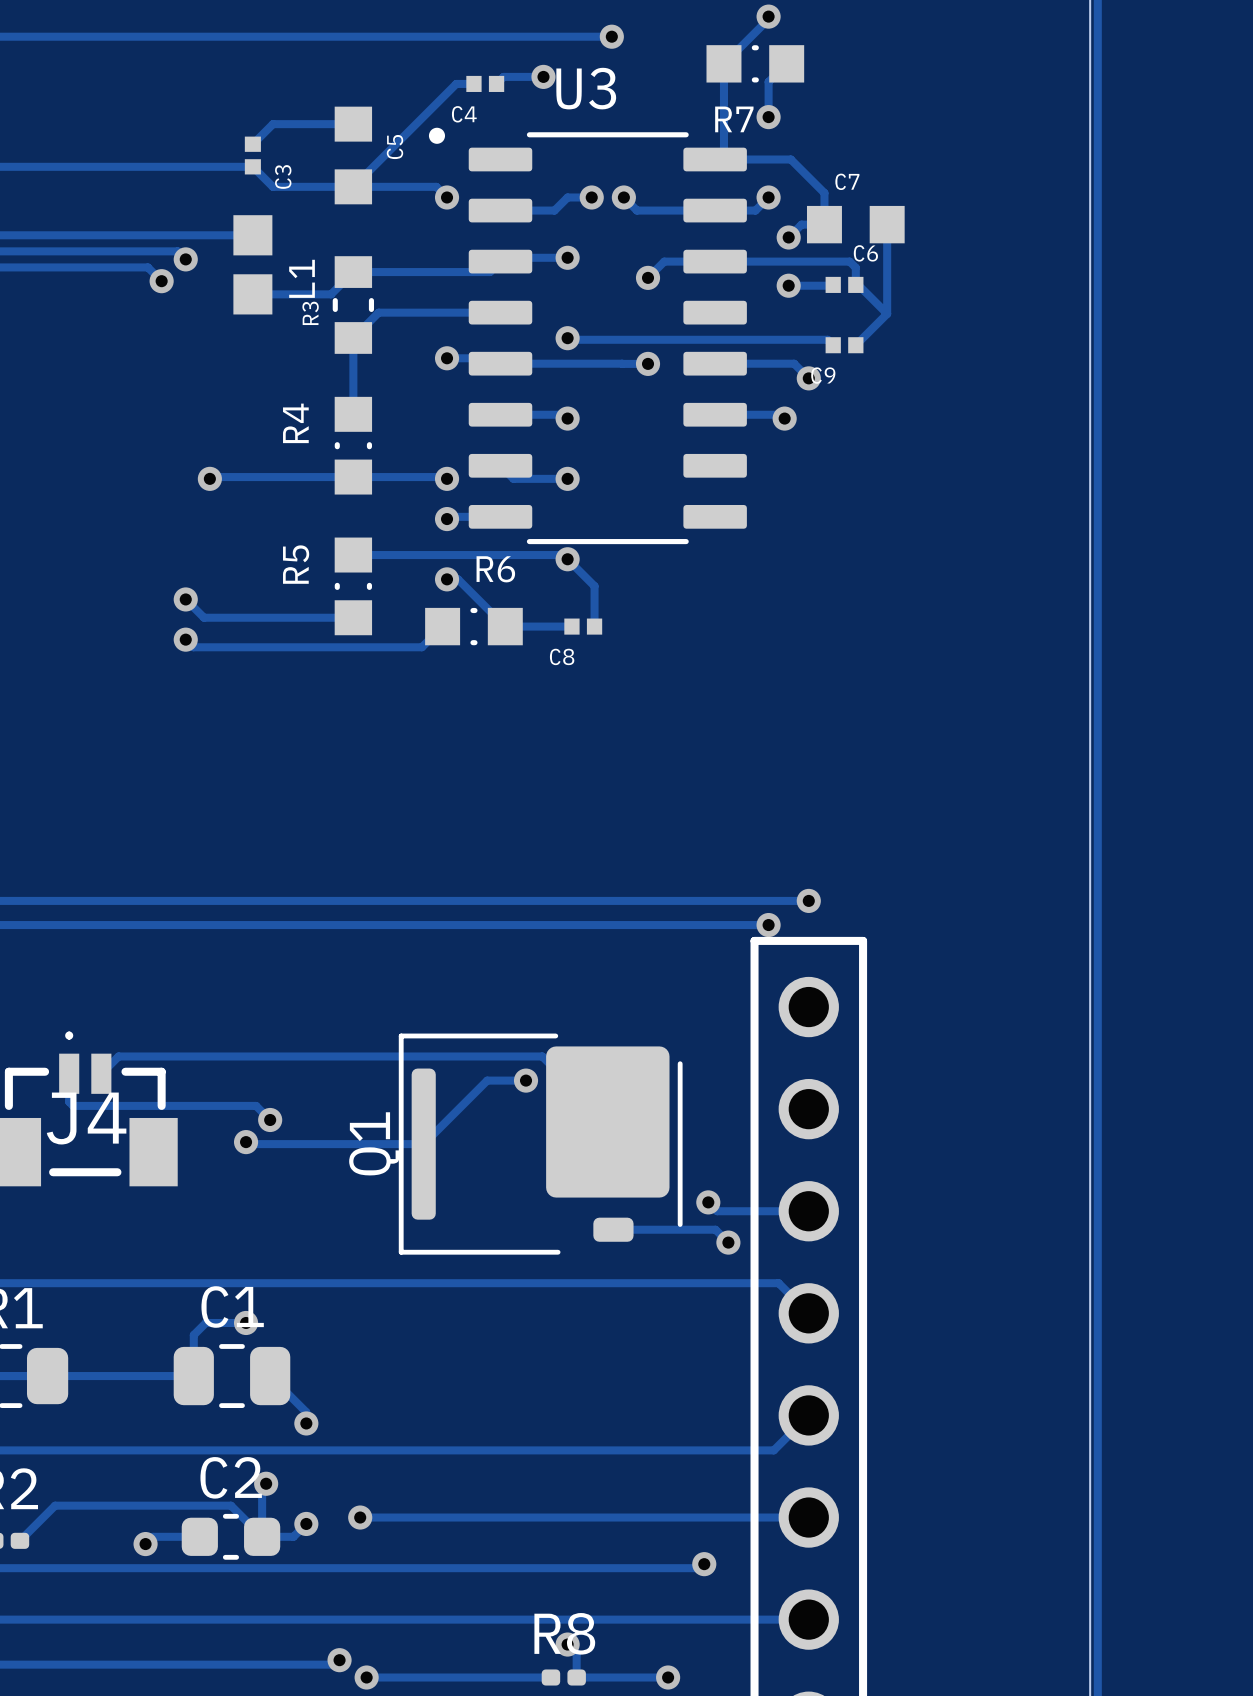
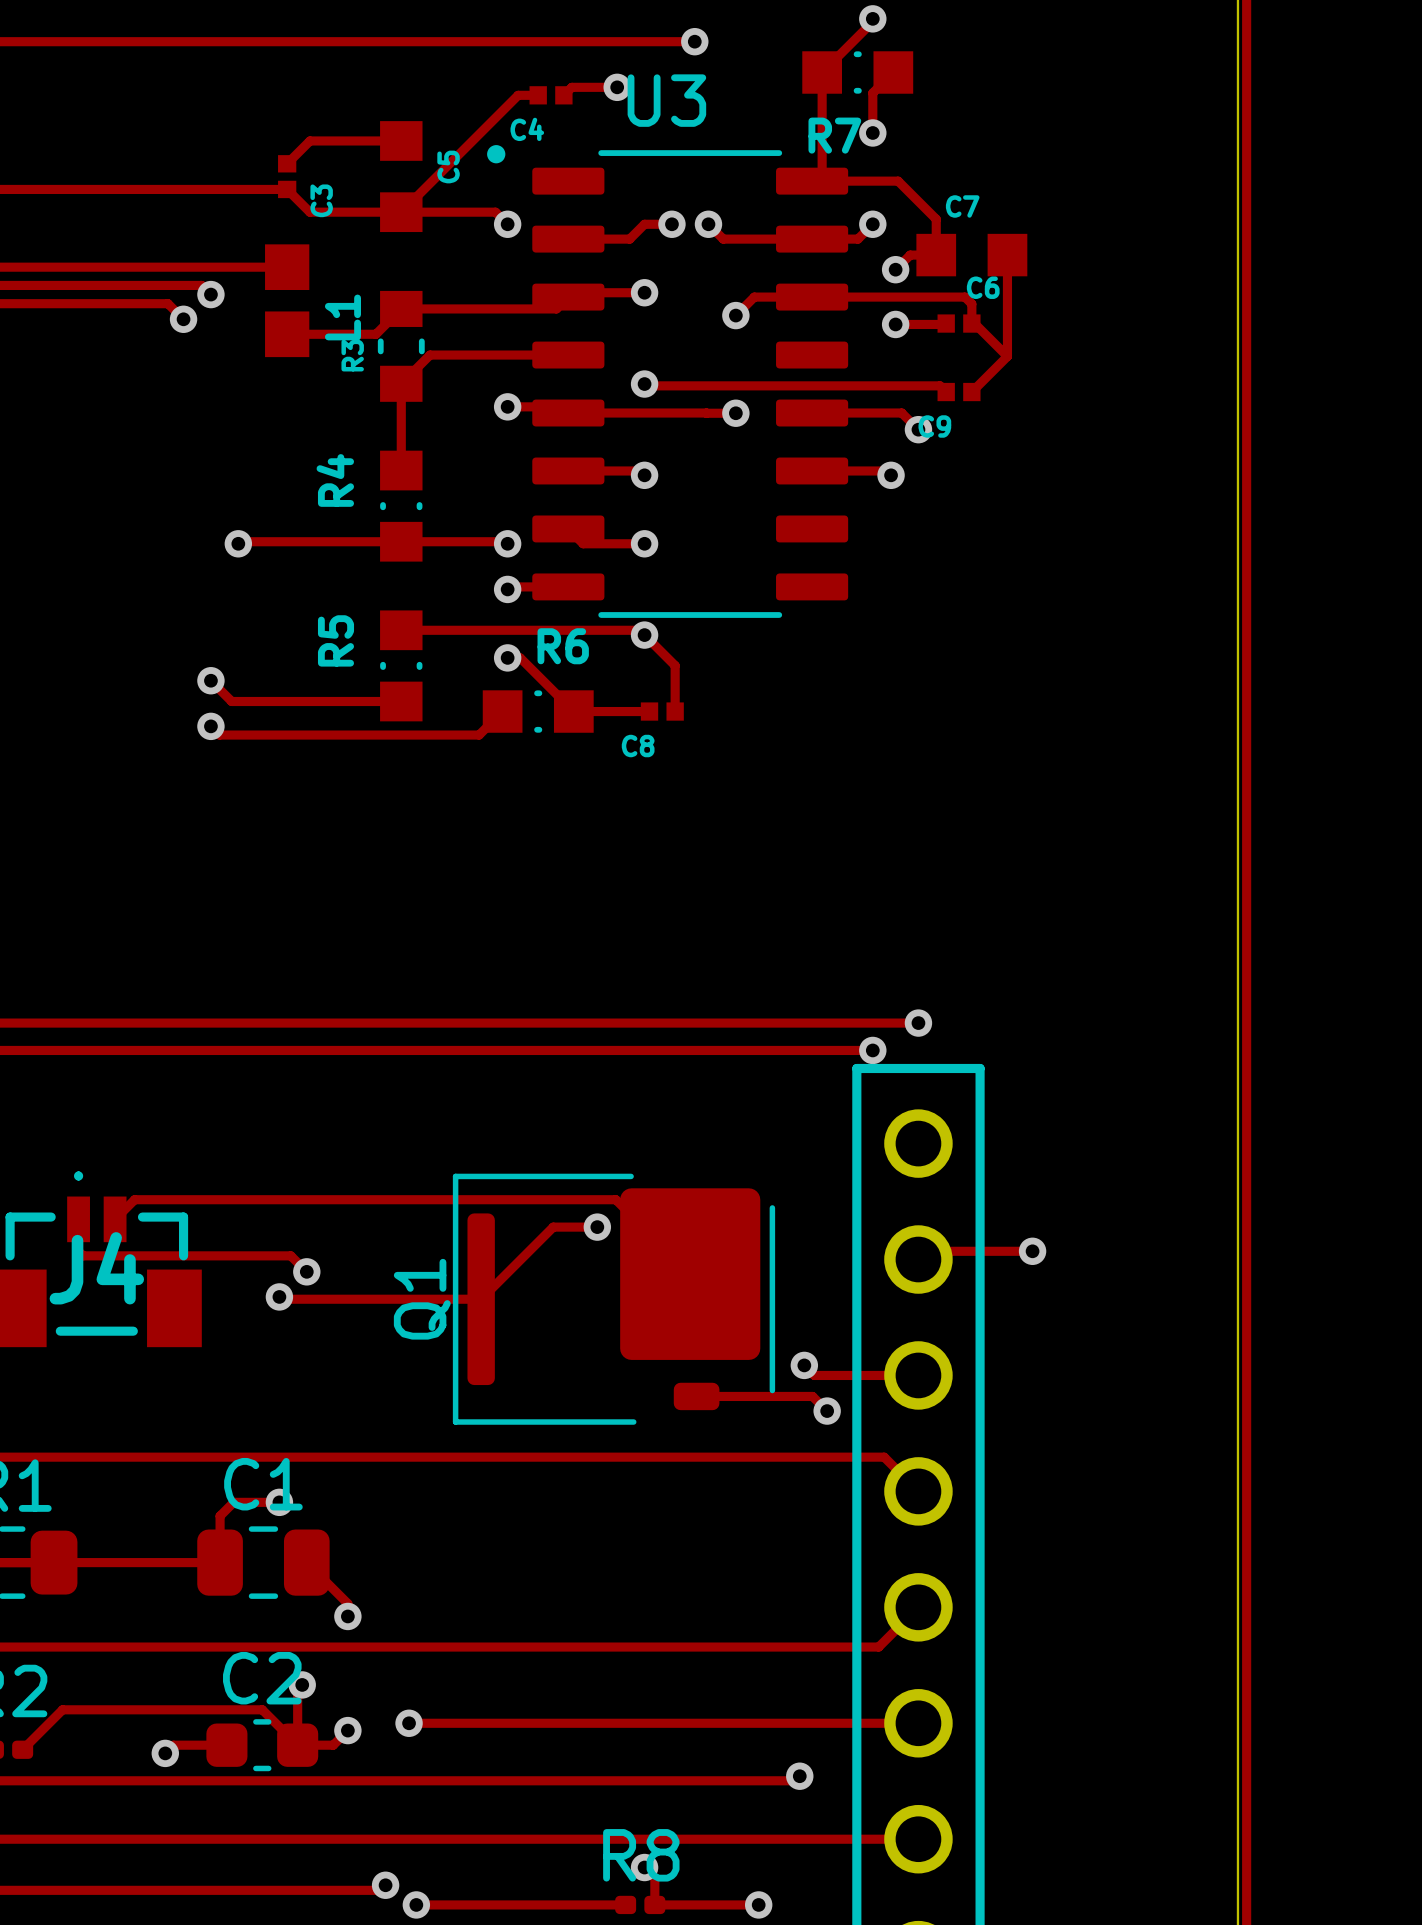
track: none -> (941, 1251) (1032, 1251)
via: none -> (1032, 1251)

